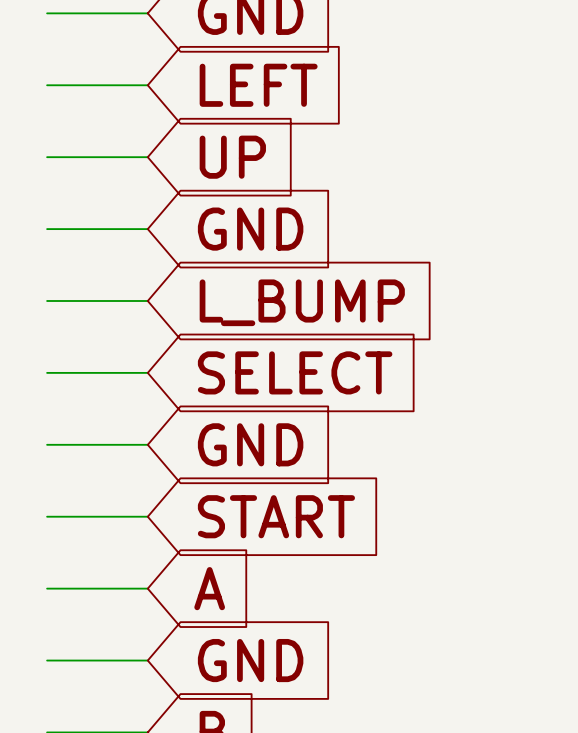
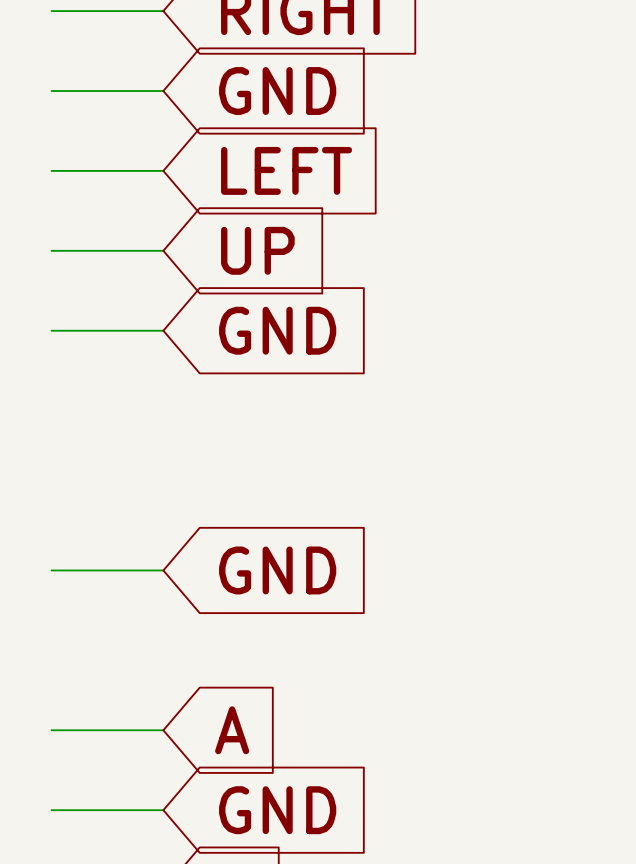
wire: (47, 300) (147, 300) -> none
global label: L_BUMP (302, 302) -> none
wire: (47, 372) (147, 372) -> none
global label: SELECT (295, 372) -> none
wire: (47, 516) (147, 516) -> none
global label: START (276, 516) -> none

